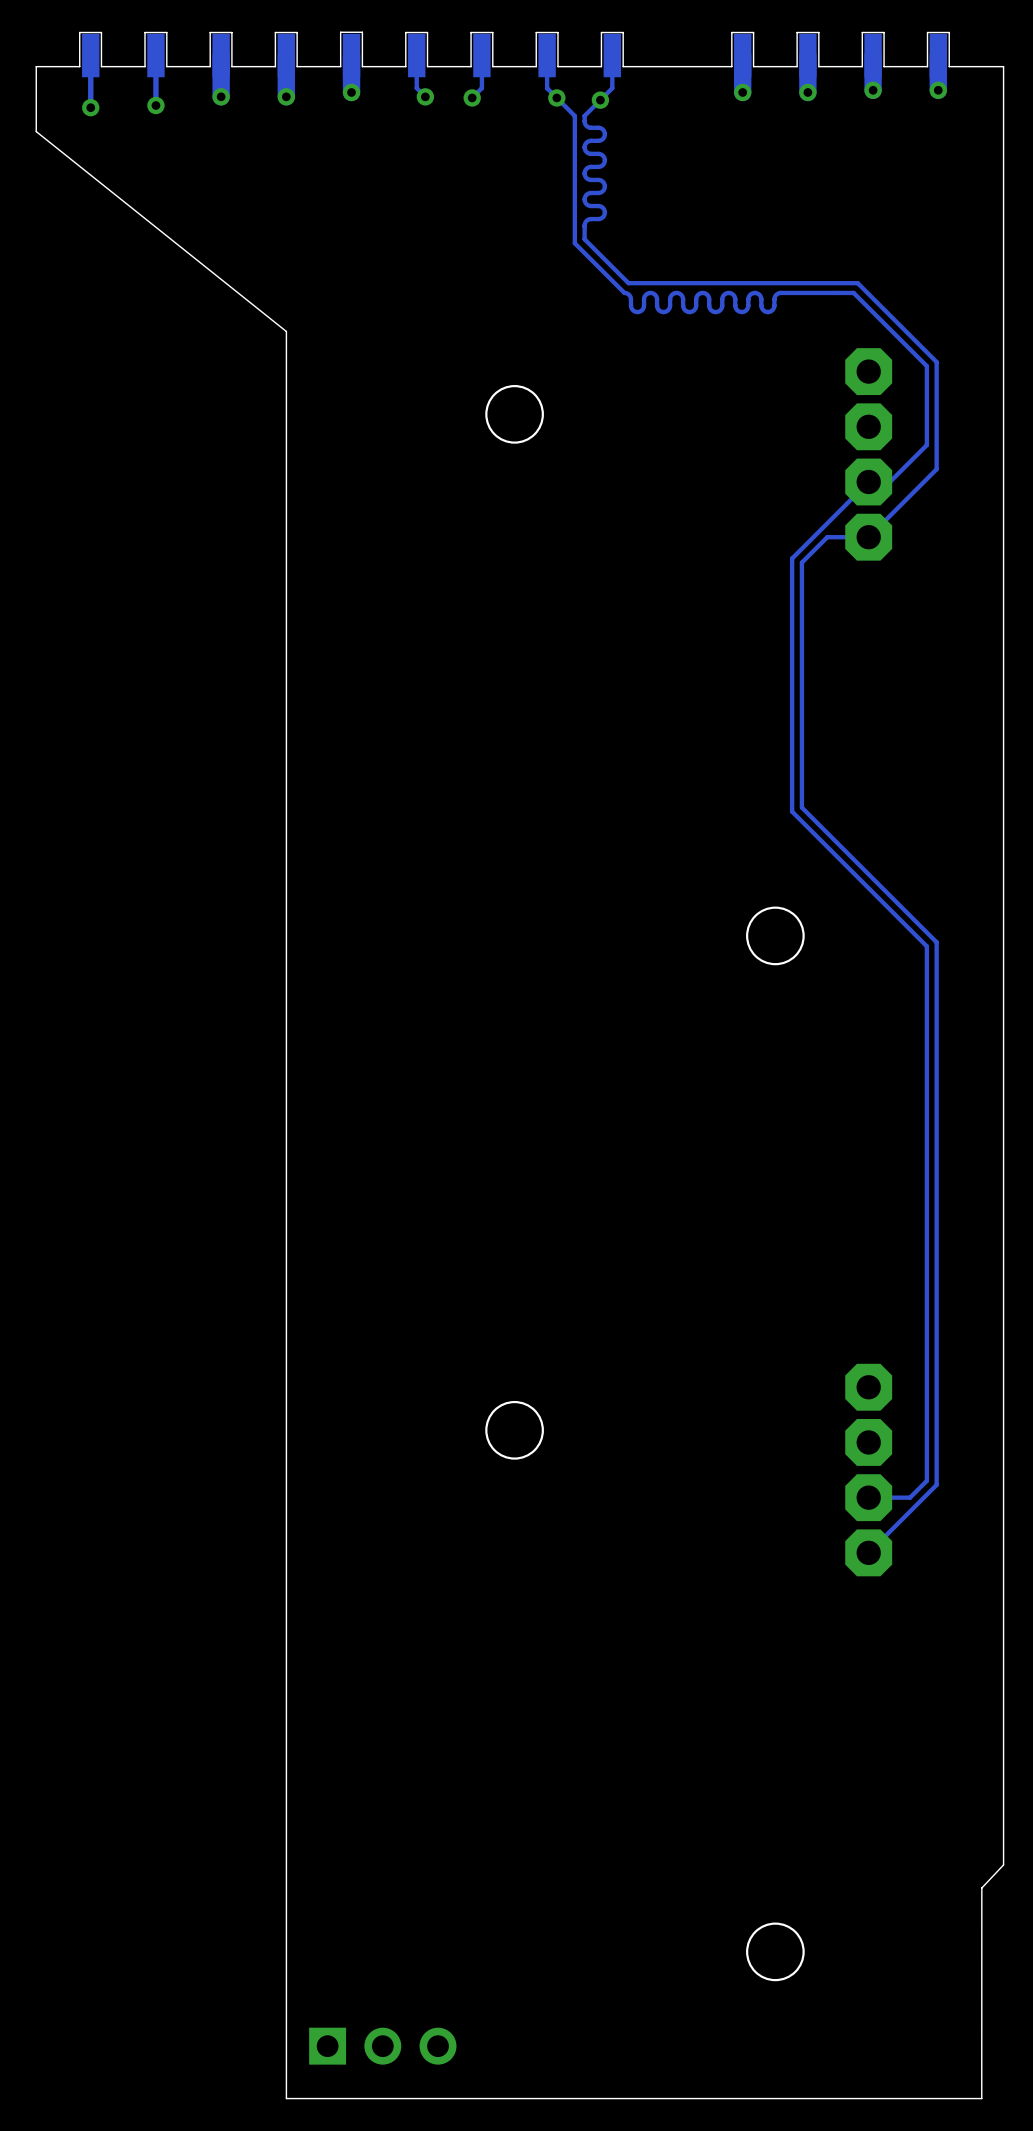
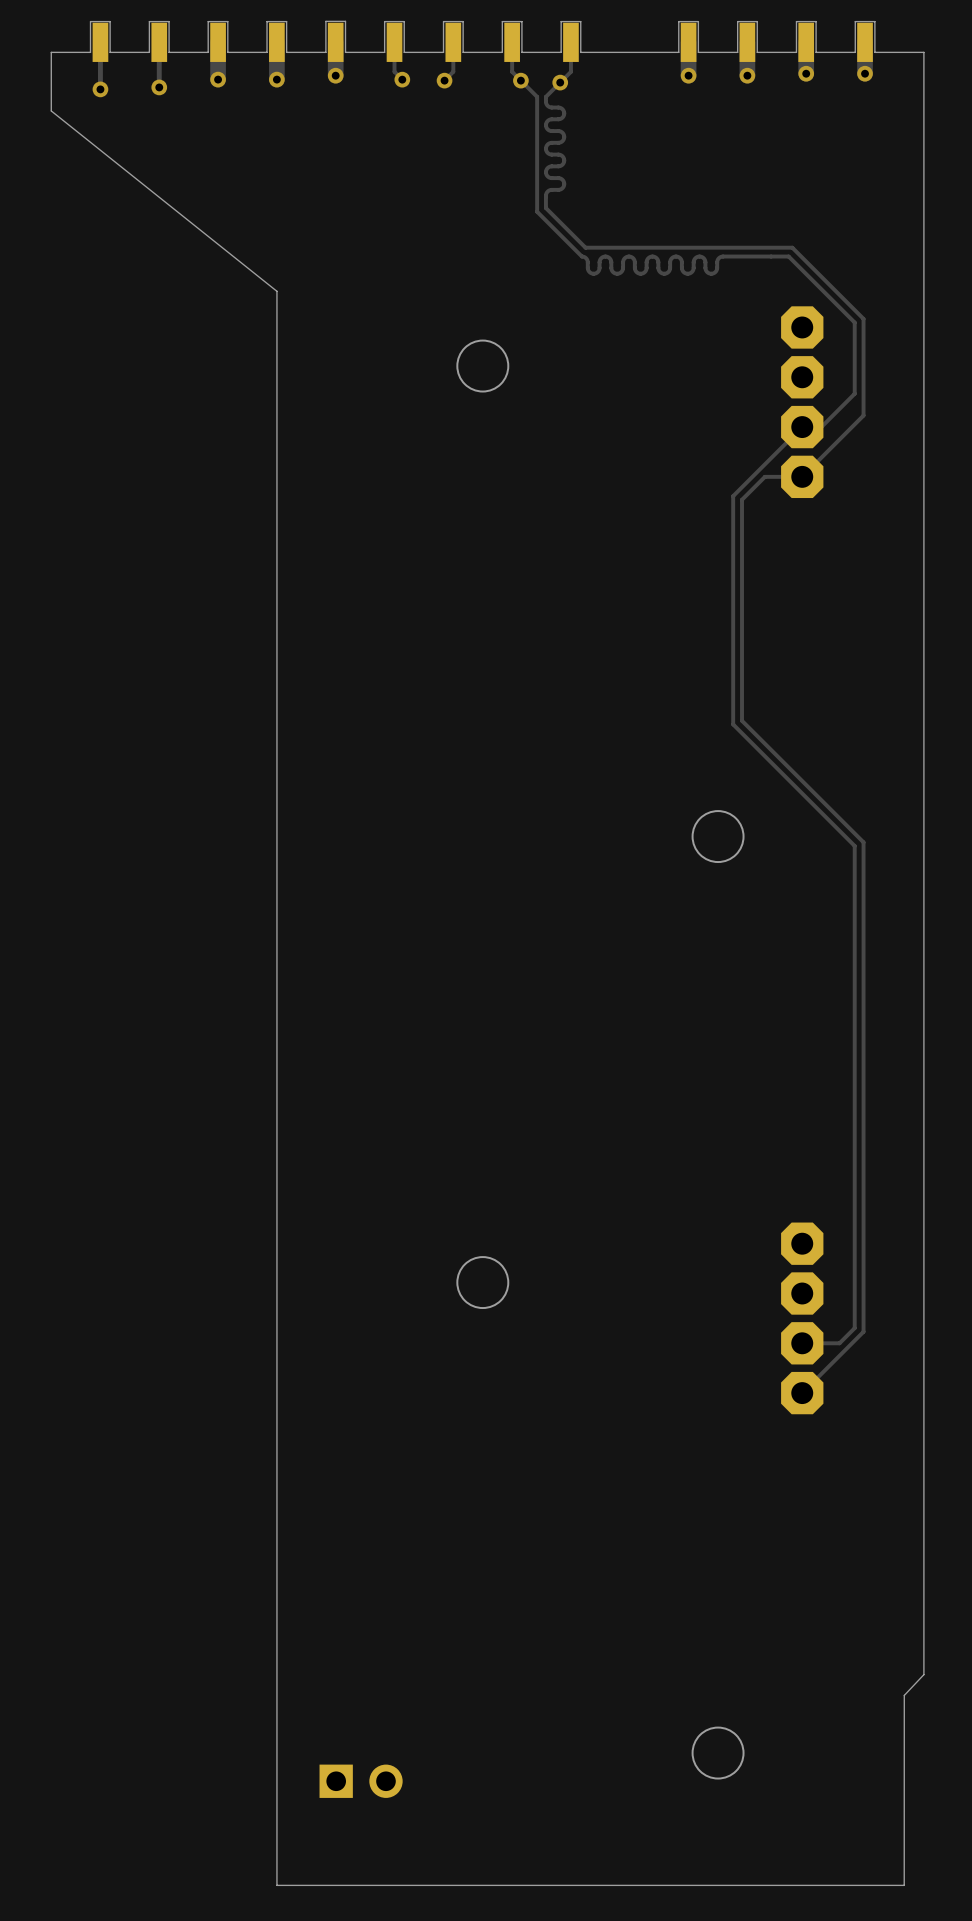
part: none -> (361, 1781)
part: (382, 2046) -> none

